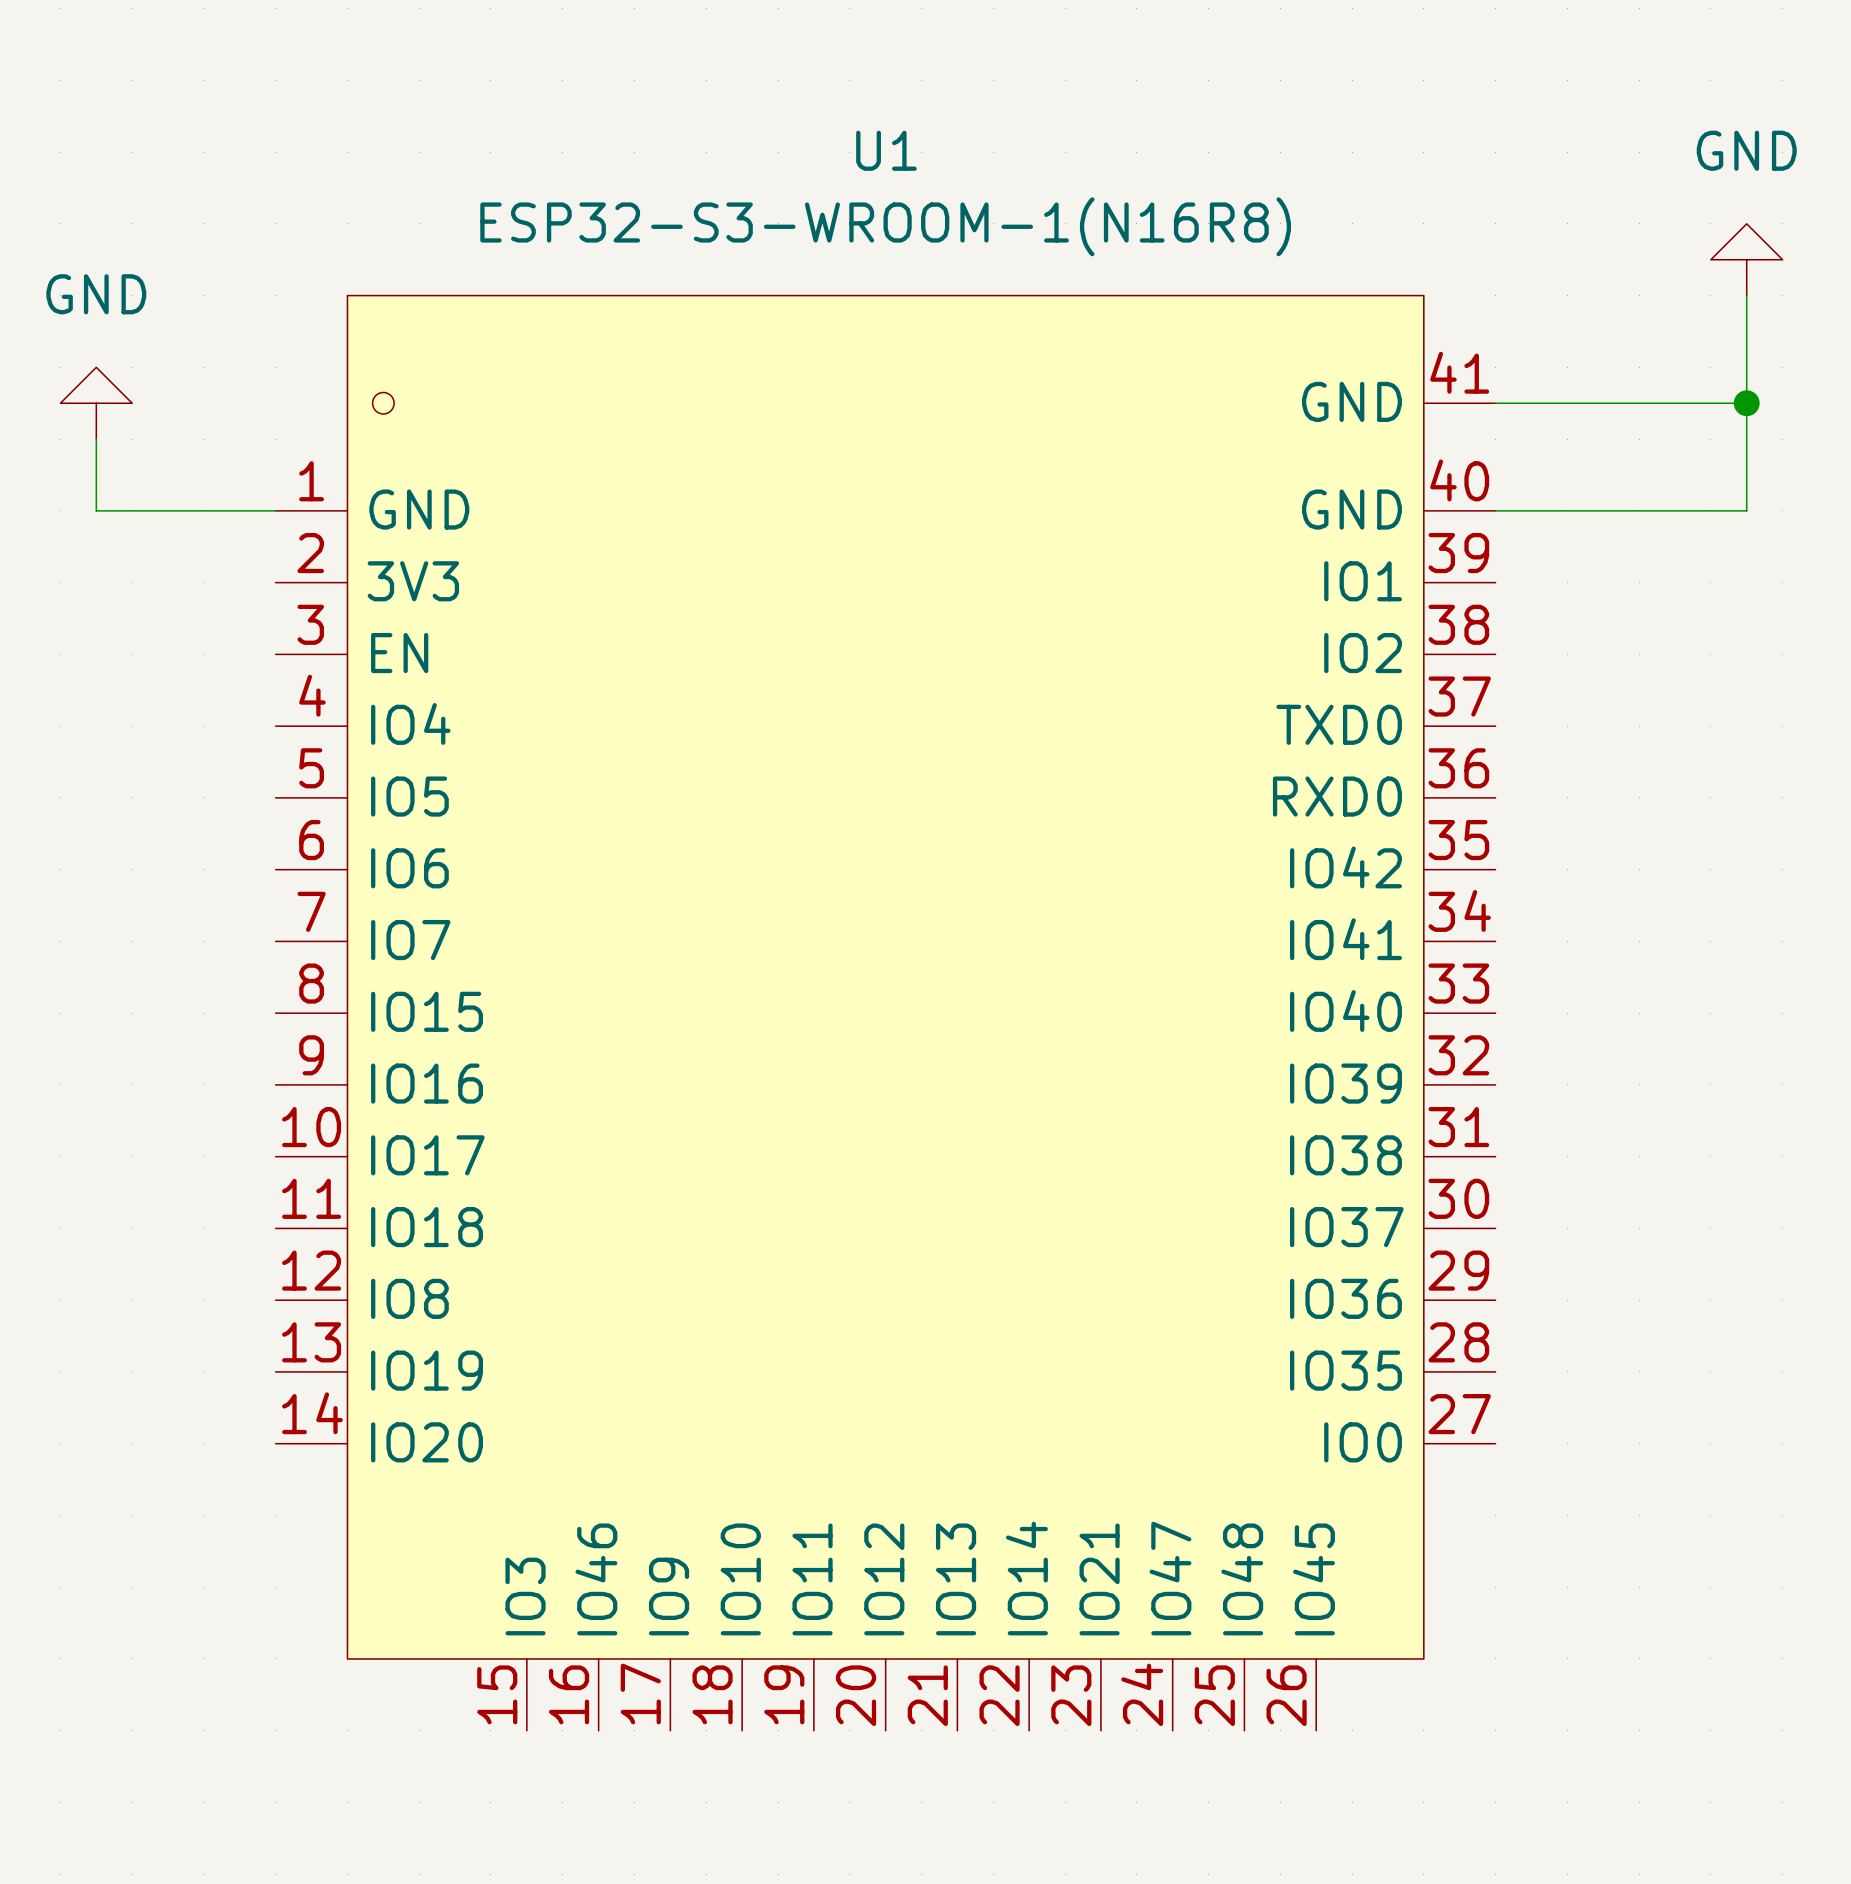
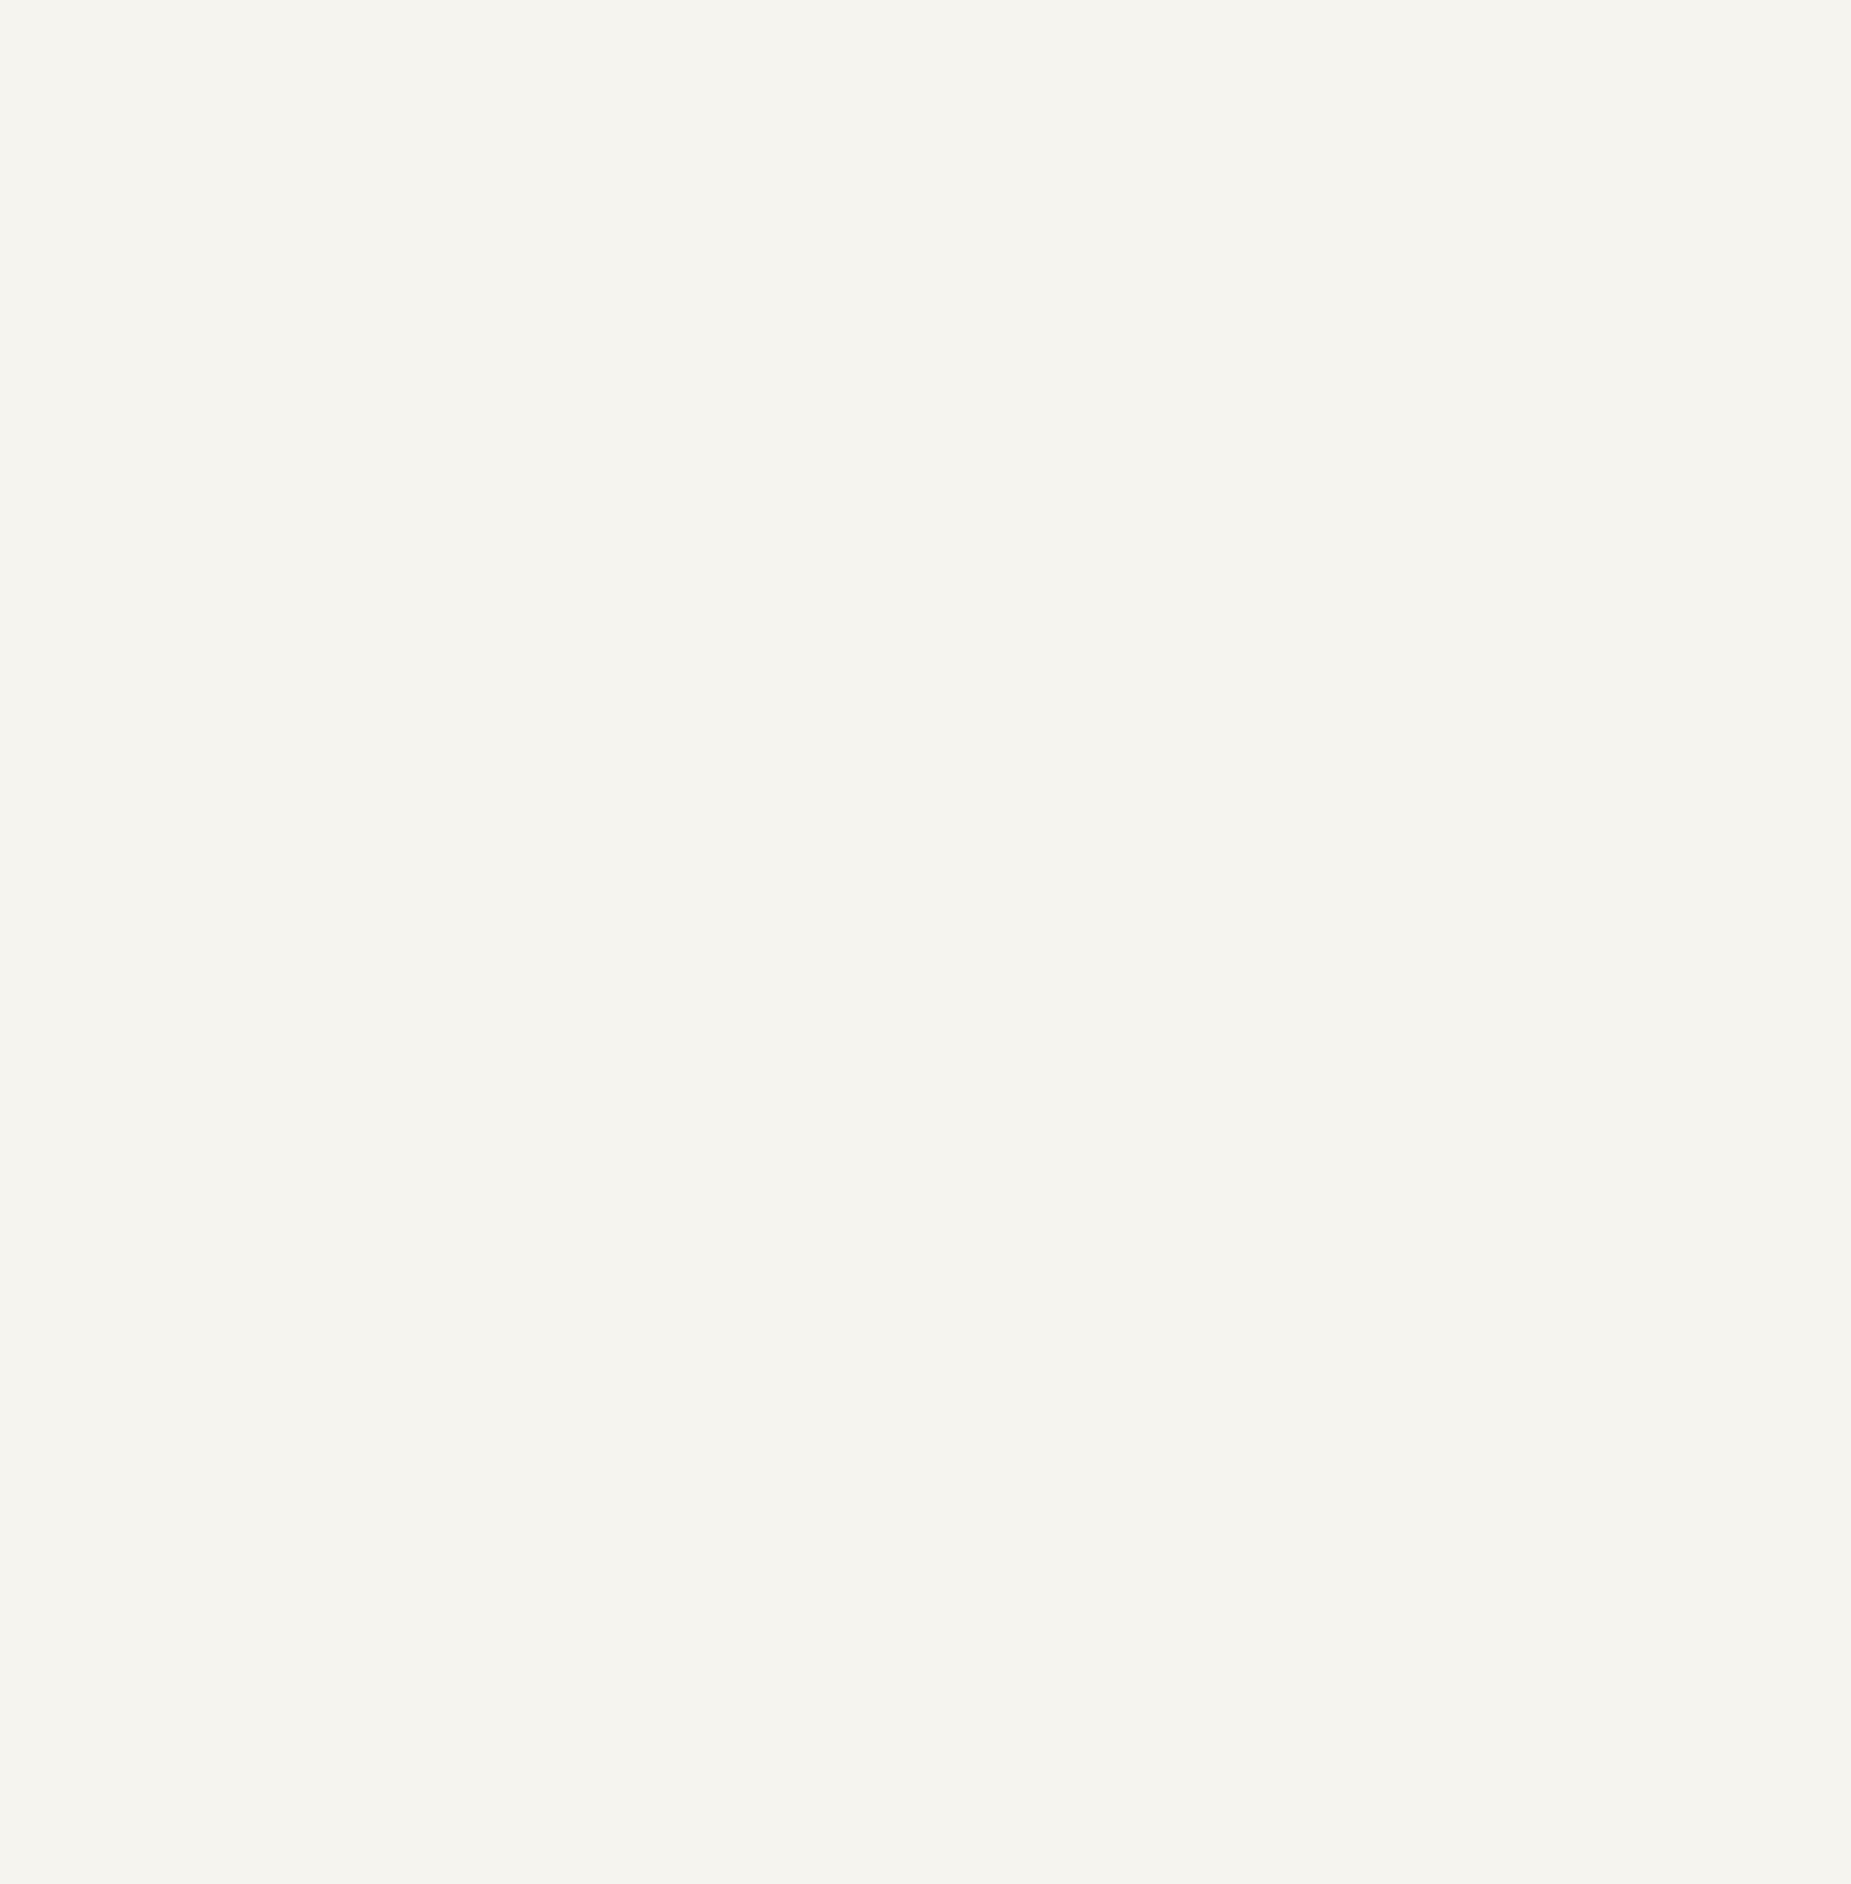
power symbol: GND (1746, 259) -> none
wire: (1746, 295) (1746, 510) (1495, 510) -> none
power symbol: GND (96, 403) -> none
wire: (1495, 403) (1746, 403) -> none
junction: (1746, 403) -> none
wire: (96, 439) (96, 510) (275, 510) -> none
U1: ESP32-S3-WROOM-1(N16R8) (885, 1013) -> none

